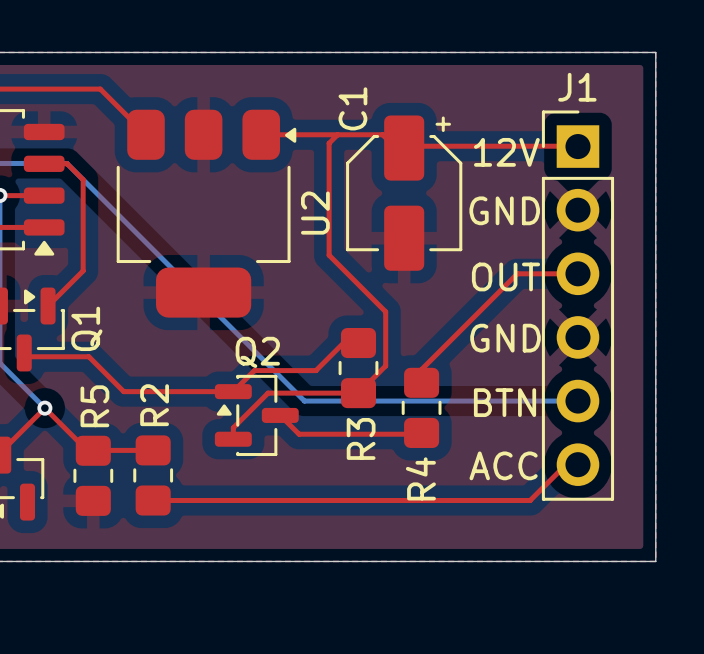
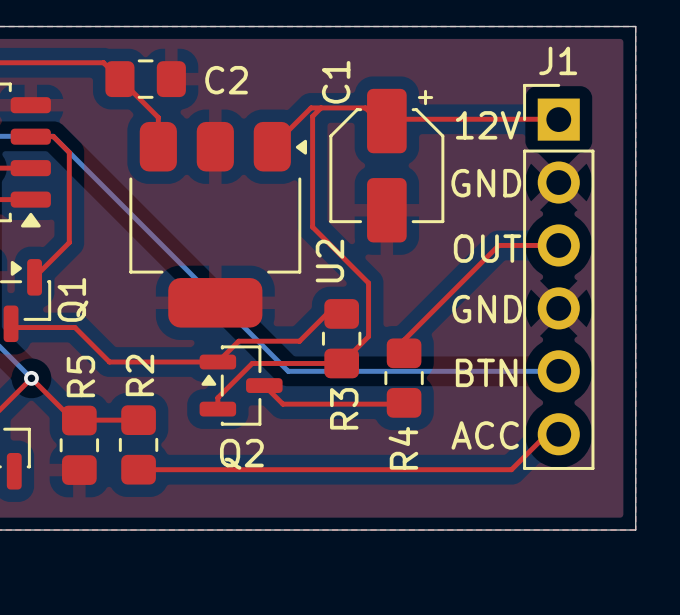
top track: (100, 89) (146, 134) -> (86, 62) (103, 62) (158, 117) (158, 146)
C2: none -> (145, 79)
top track: (261, 134) (327, 134) -> (266, 152) (311, 107)
U2 position: (206, 213) -> (218, 224)
U2 name position: U2 (315, 213) -> U2 (329, 260)
Q2 name position: Q2 (257, 352) -> Q2 (241, 454)

